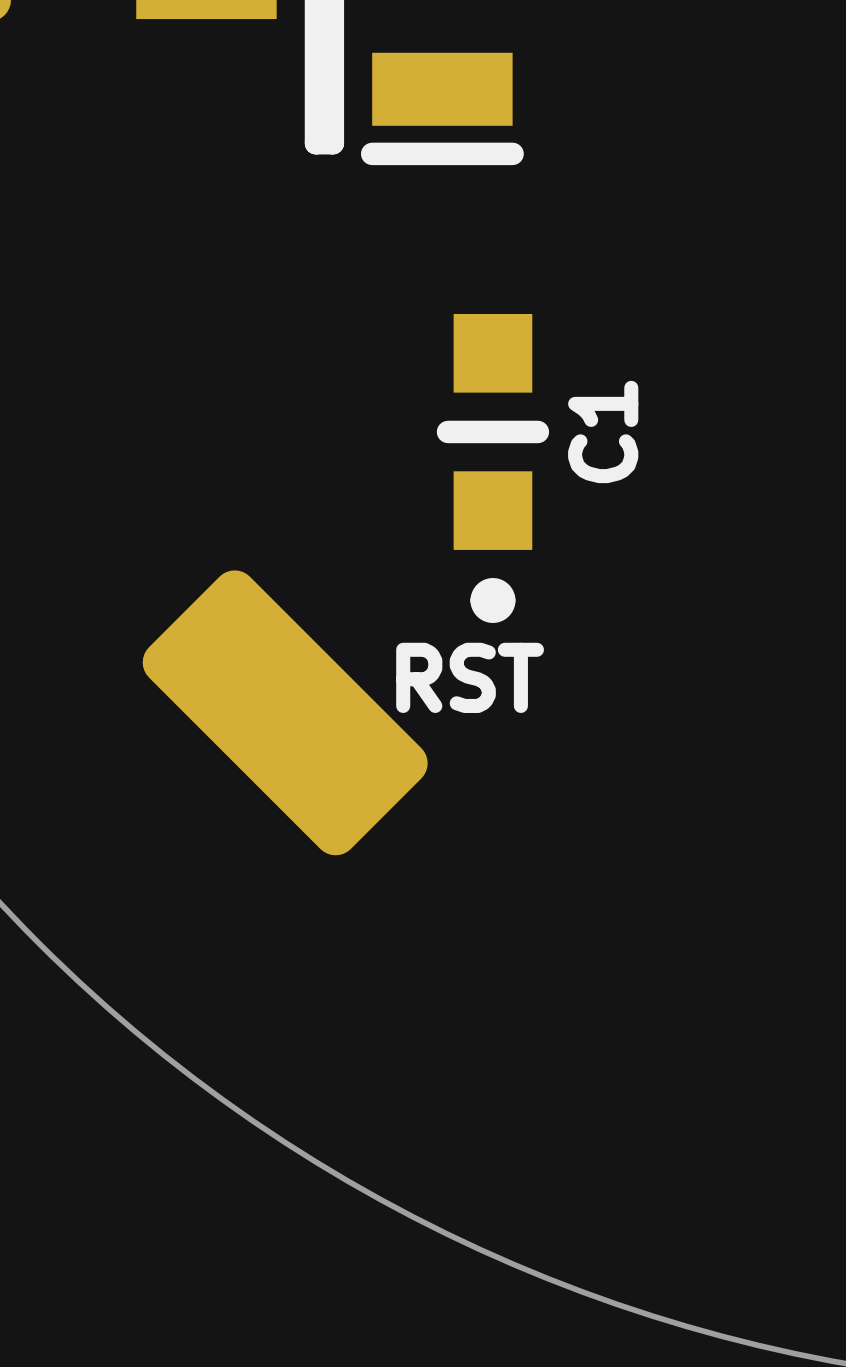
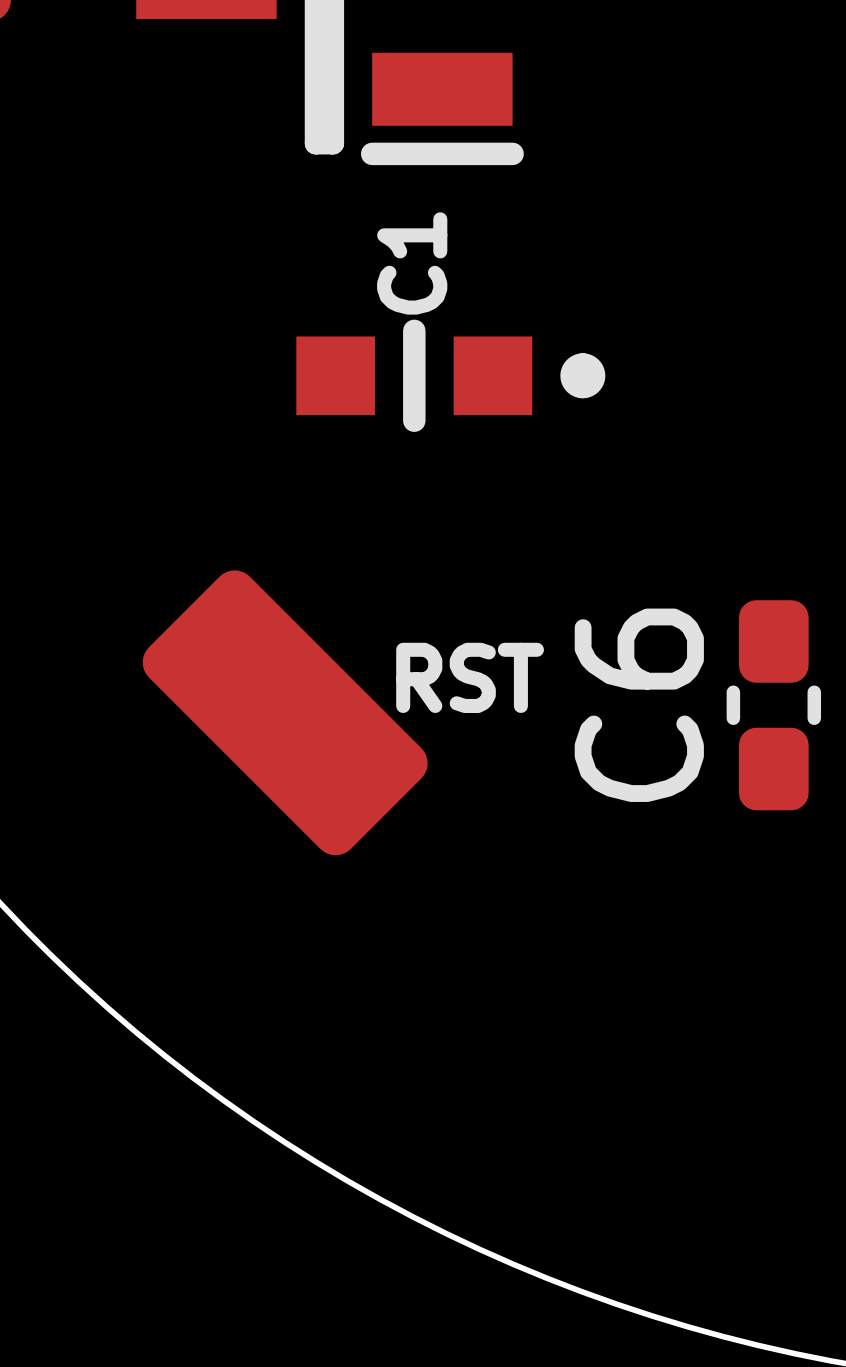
C1 rotation: 0° (492, 468) -> 90° counterclockwise (450, 375)
C6: none -> (773, 705)

